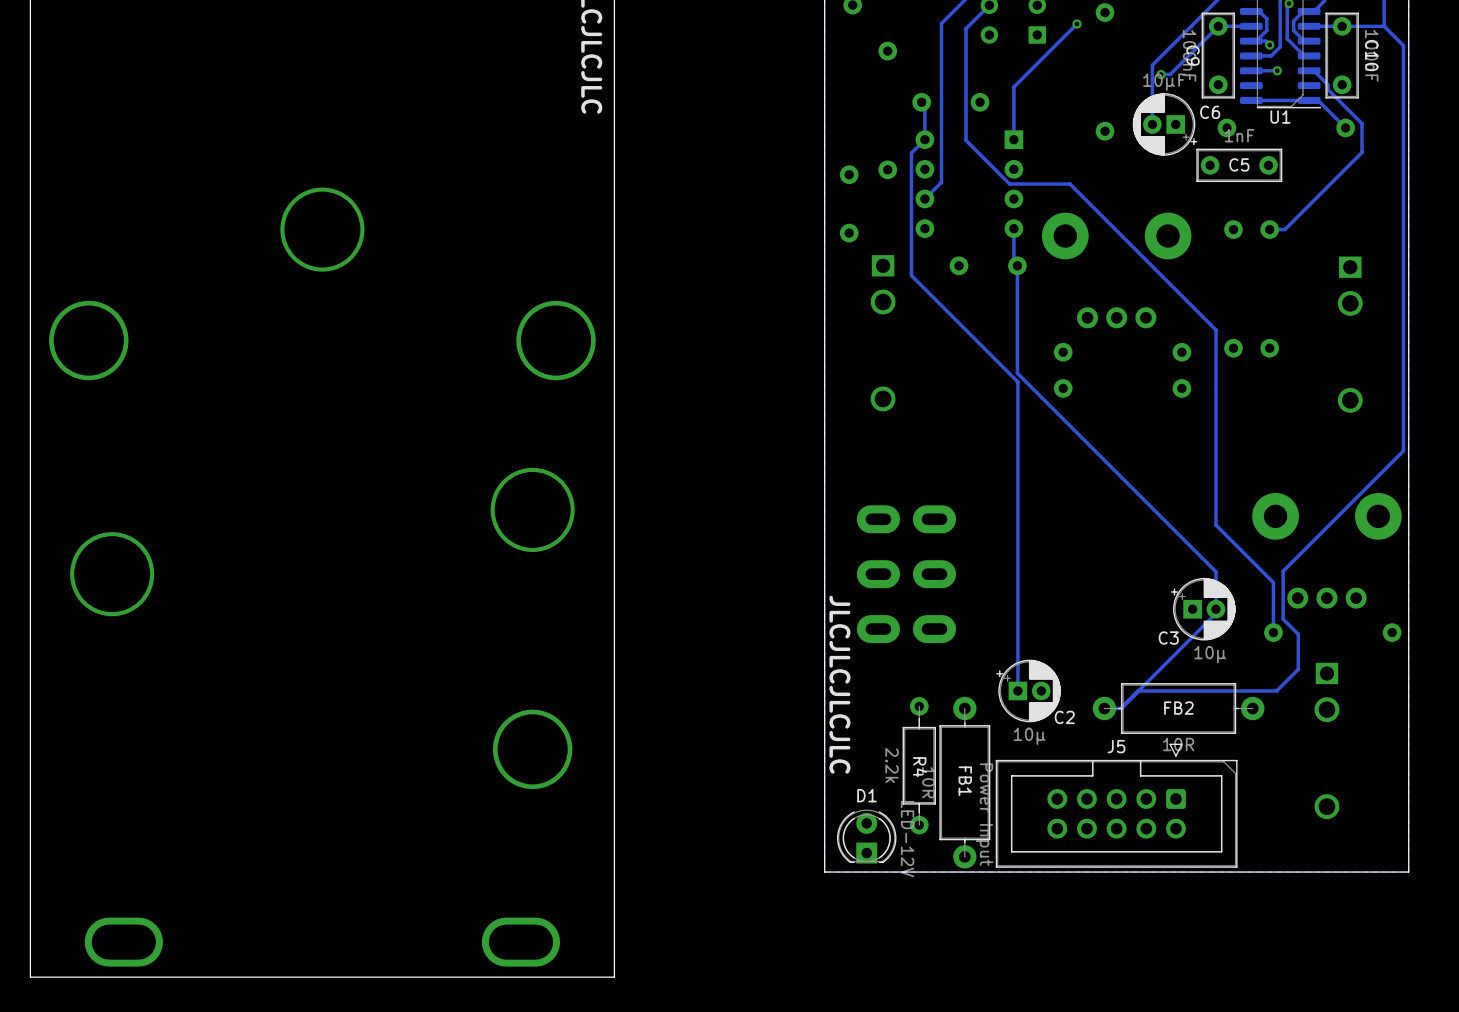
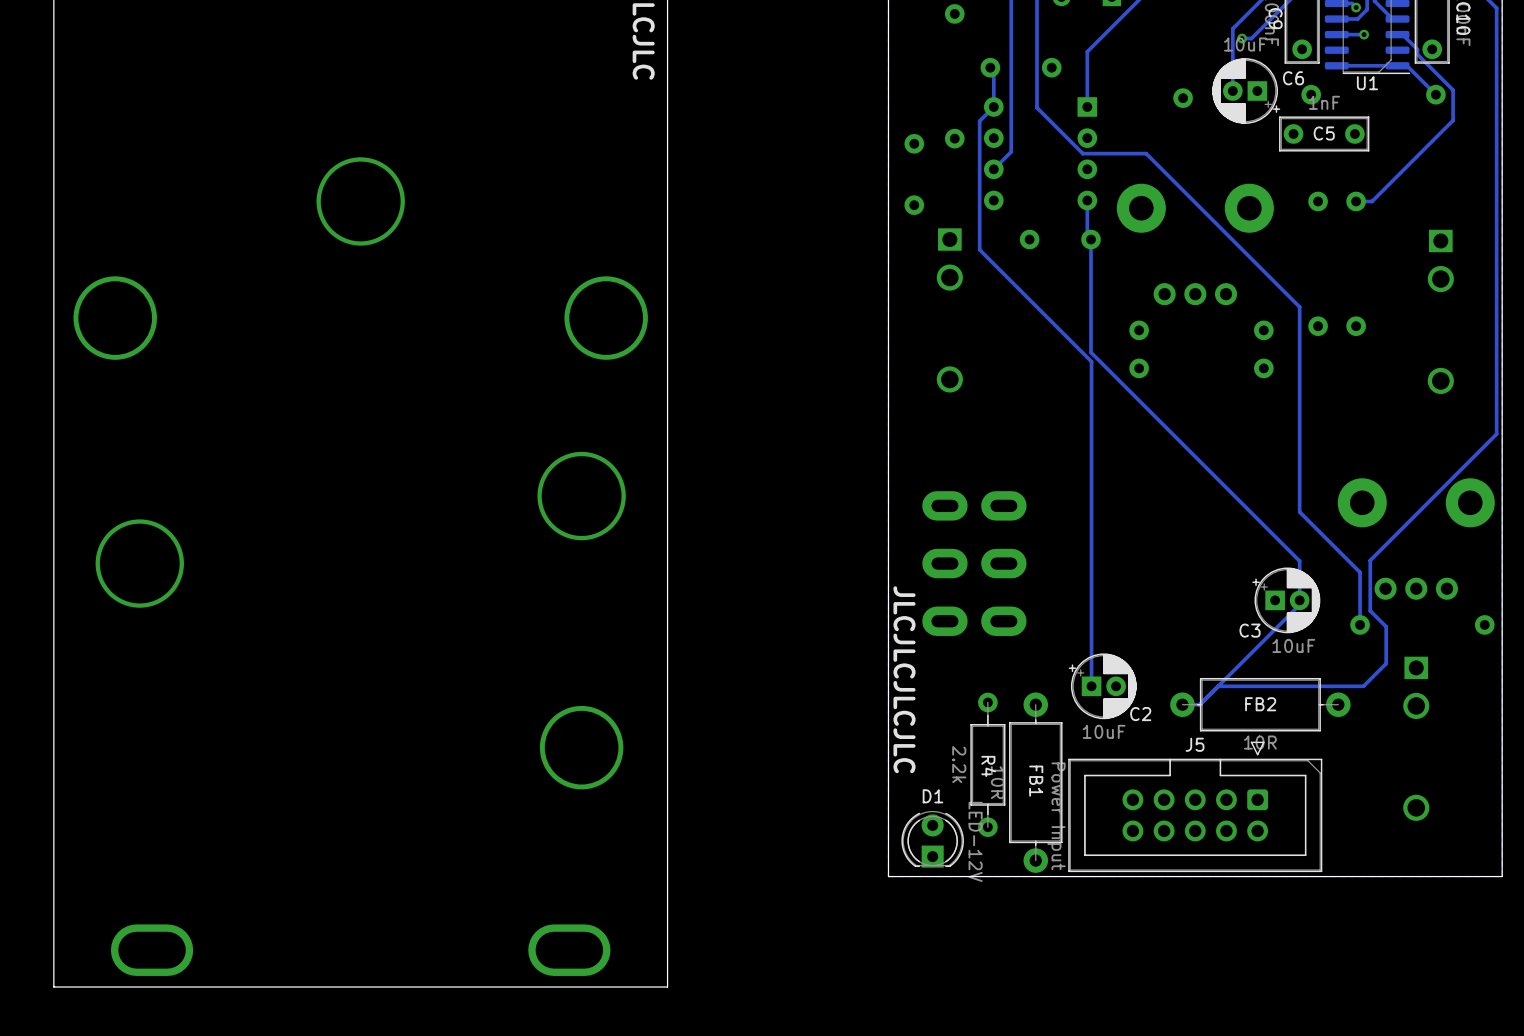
C6 value: 10µF (1164, 82) -> 10uF (1245, 44)
C3 value: 10µ (1210, 654) -> 10uF (1293, 645)
C2 value: 10µ (1029, 736) -> 10uF (1104, 731)

